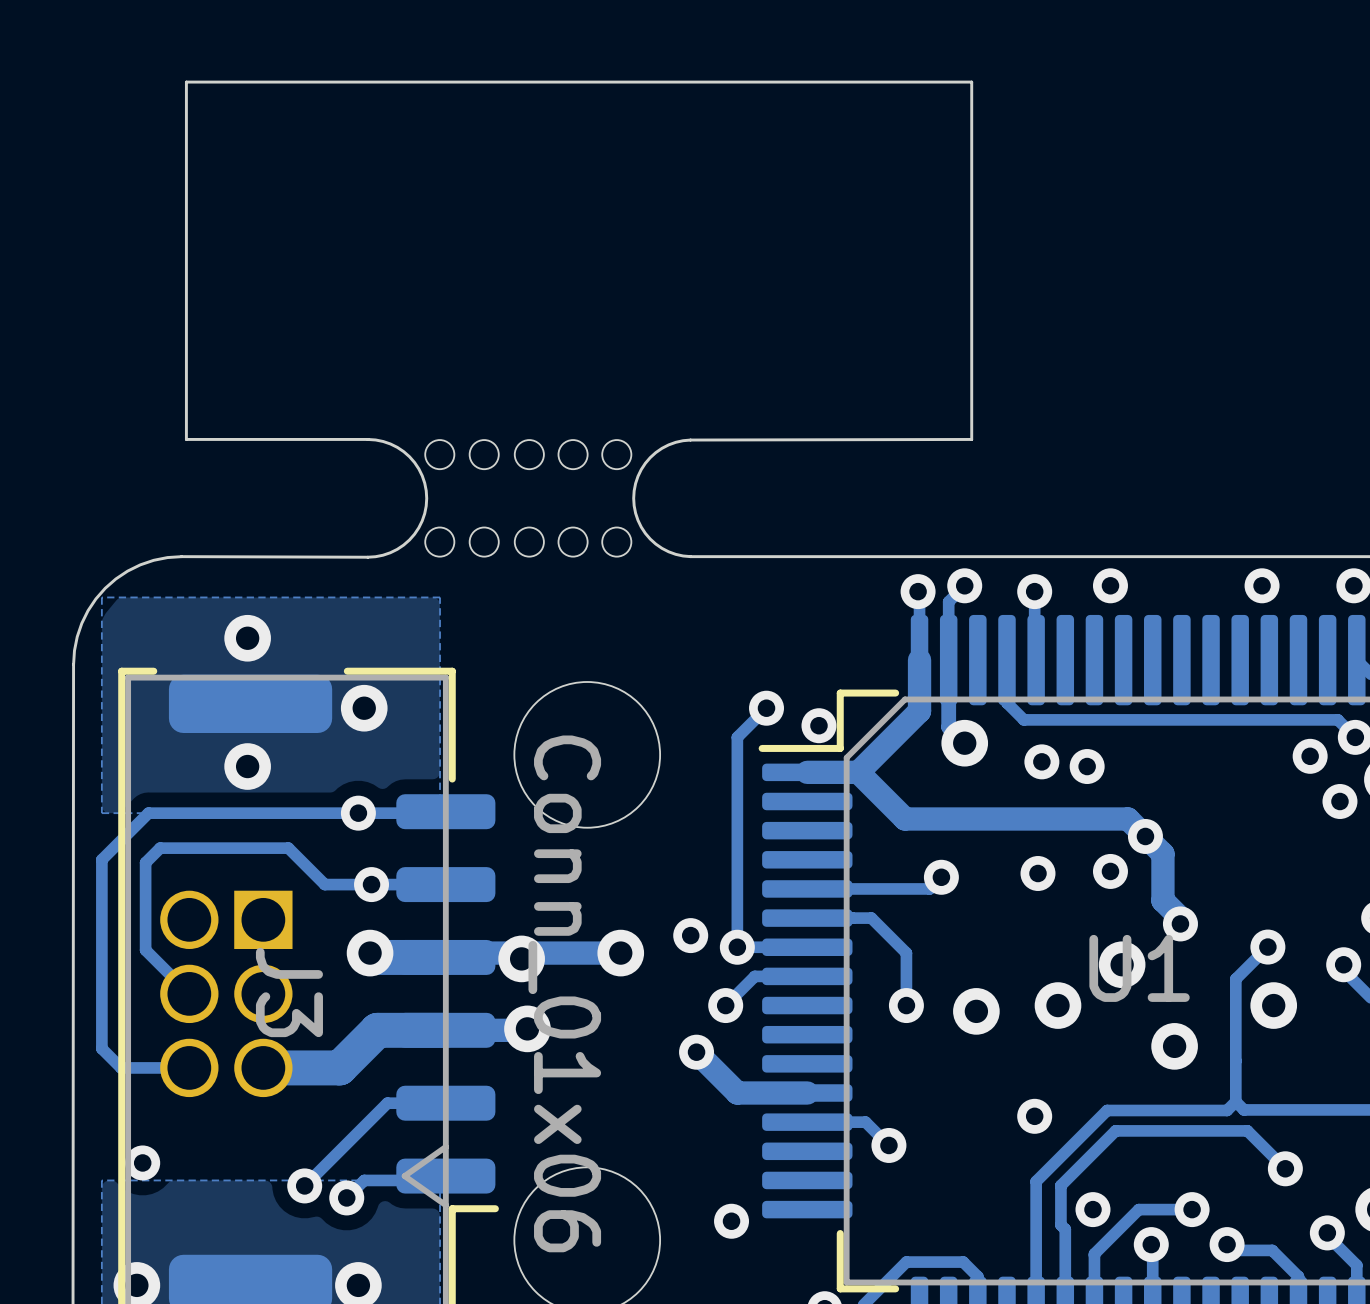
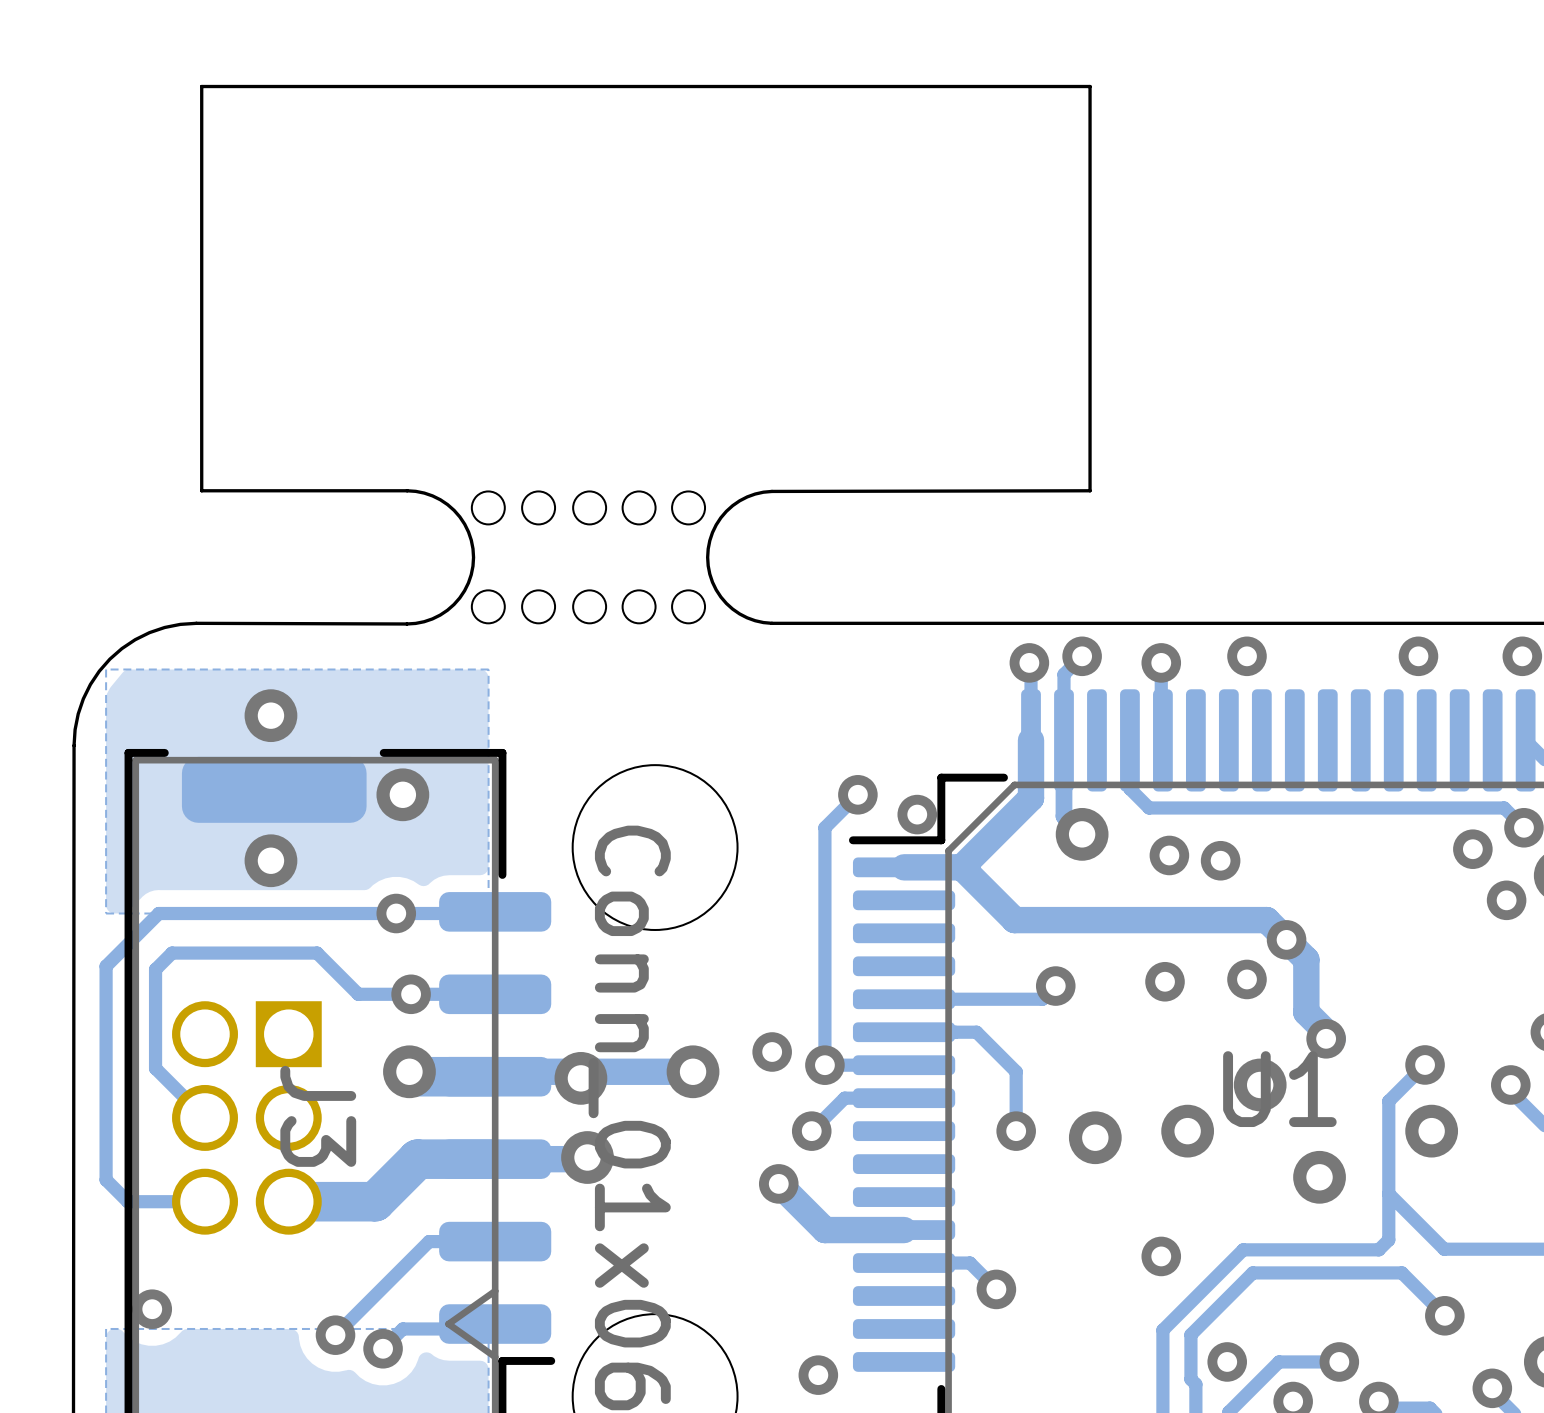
track: (1235, 1101) (1244, 1109) (1284, 1109) -> (1388, 1193) (1444, 1249)

